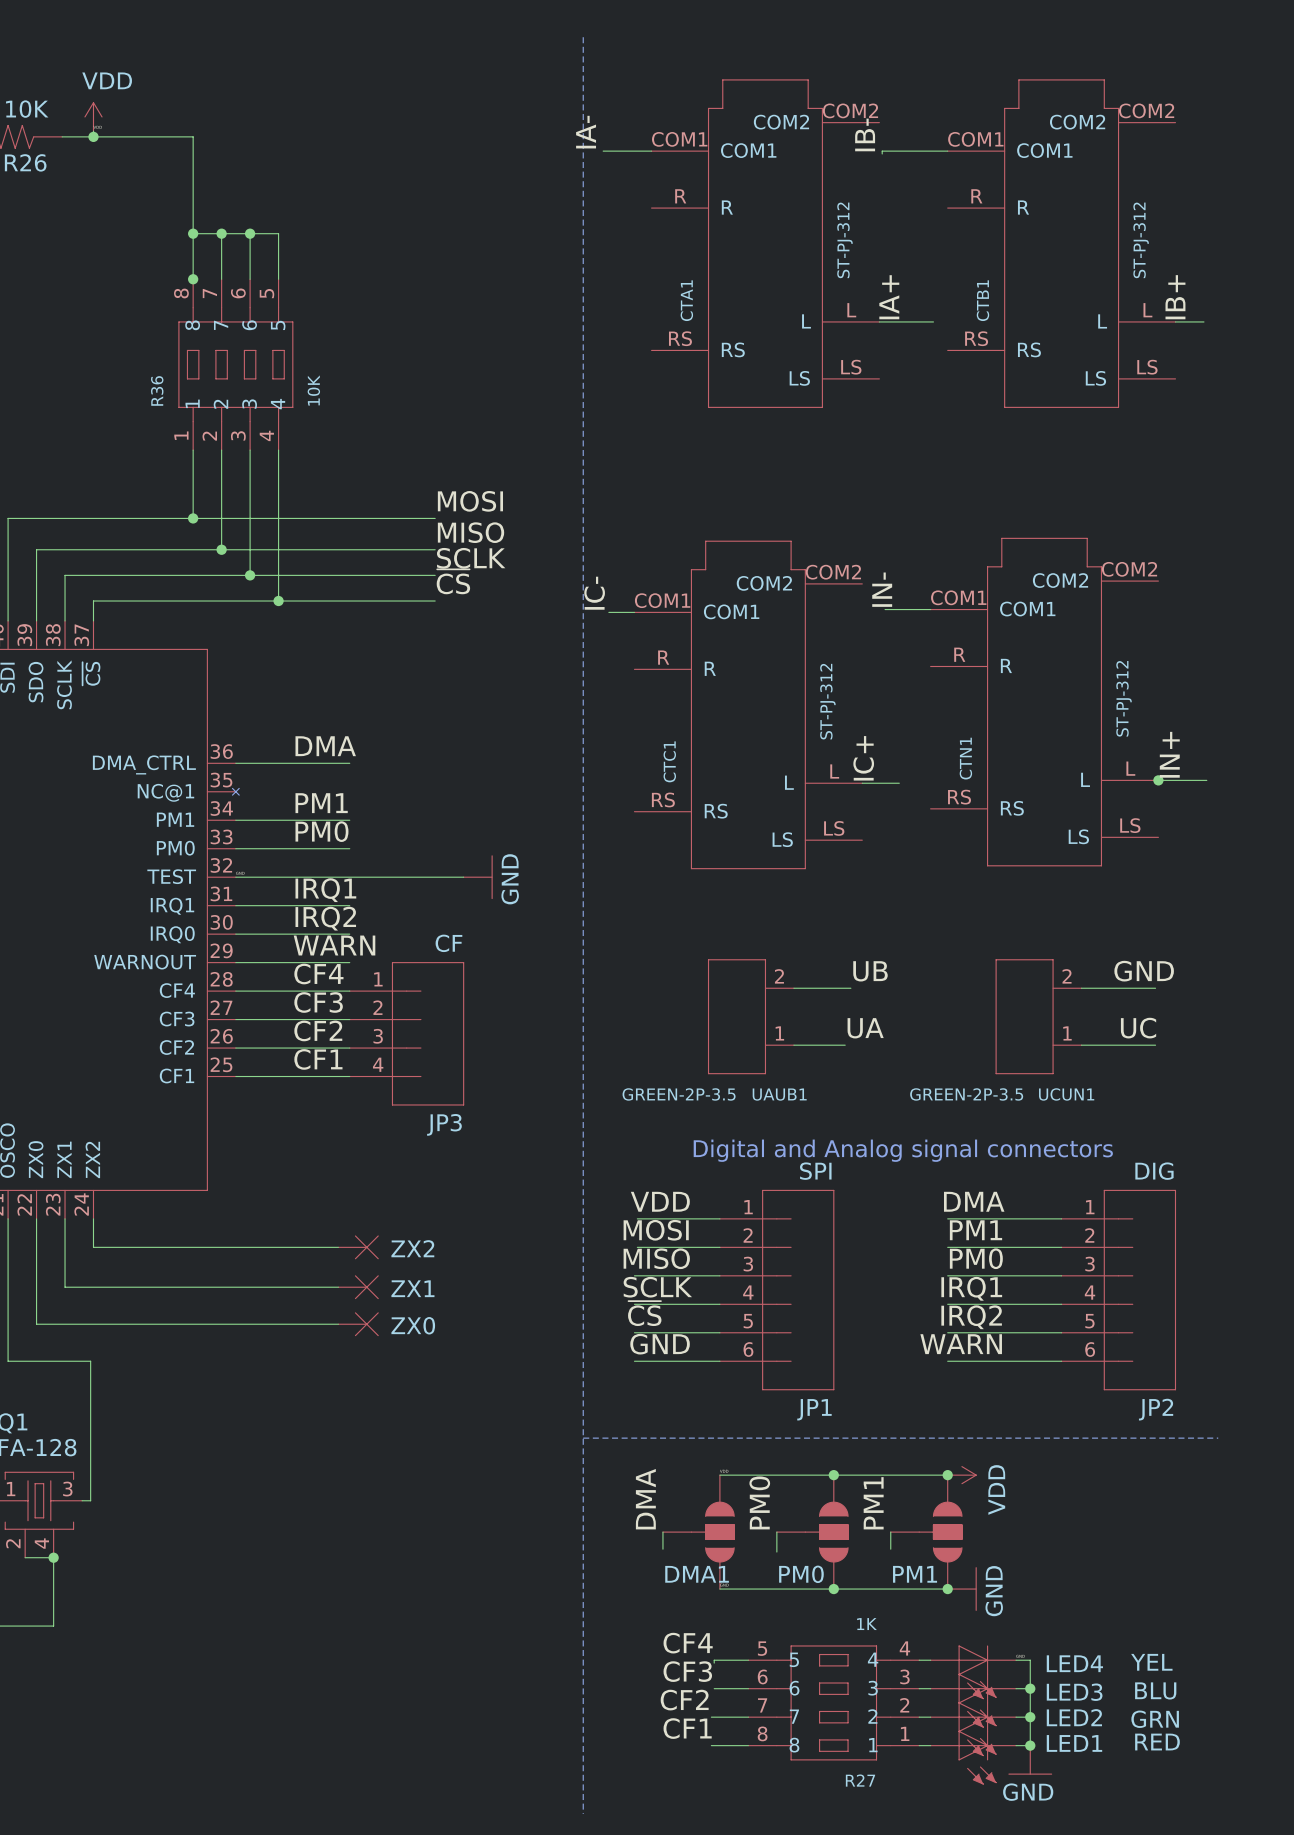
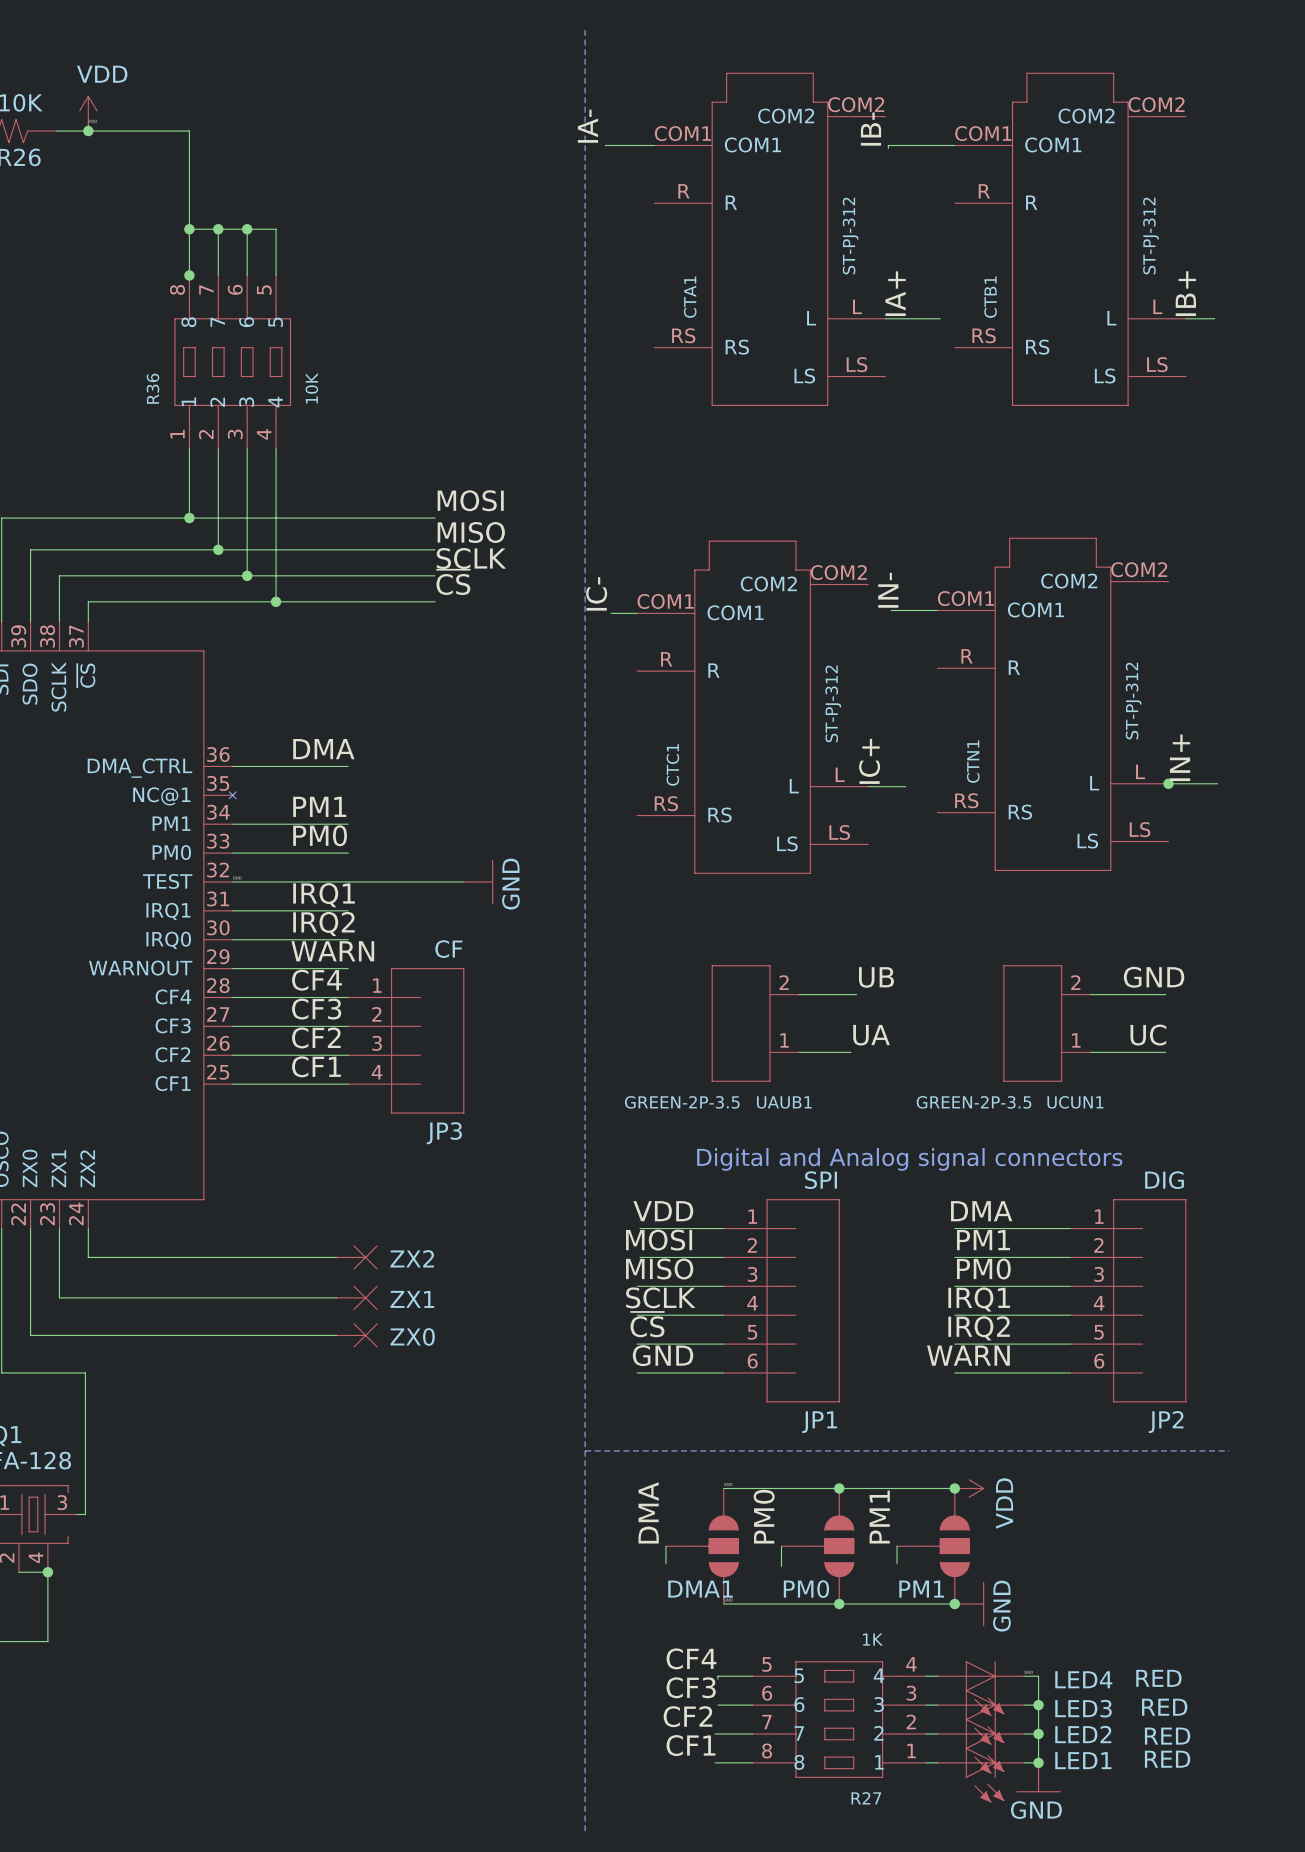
LED4 value: YEL (1151, 1662) -> RED (1158, 1678)
LED3 value: BLU (1155, 1690) -> RED (1164, 1707)
LED2 value: GRN (1155, 1719) -> RED (1167, 1736)

